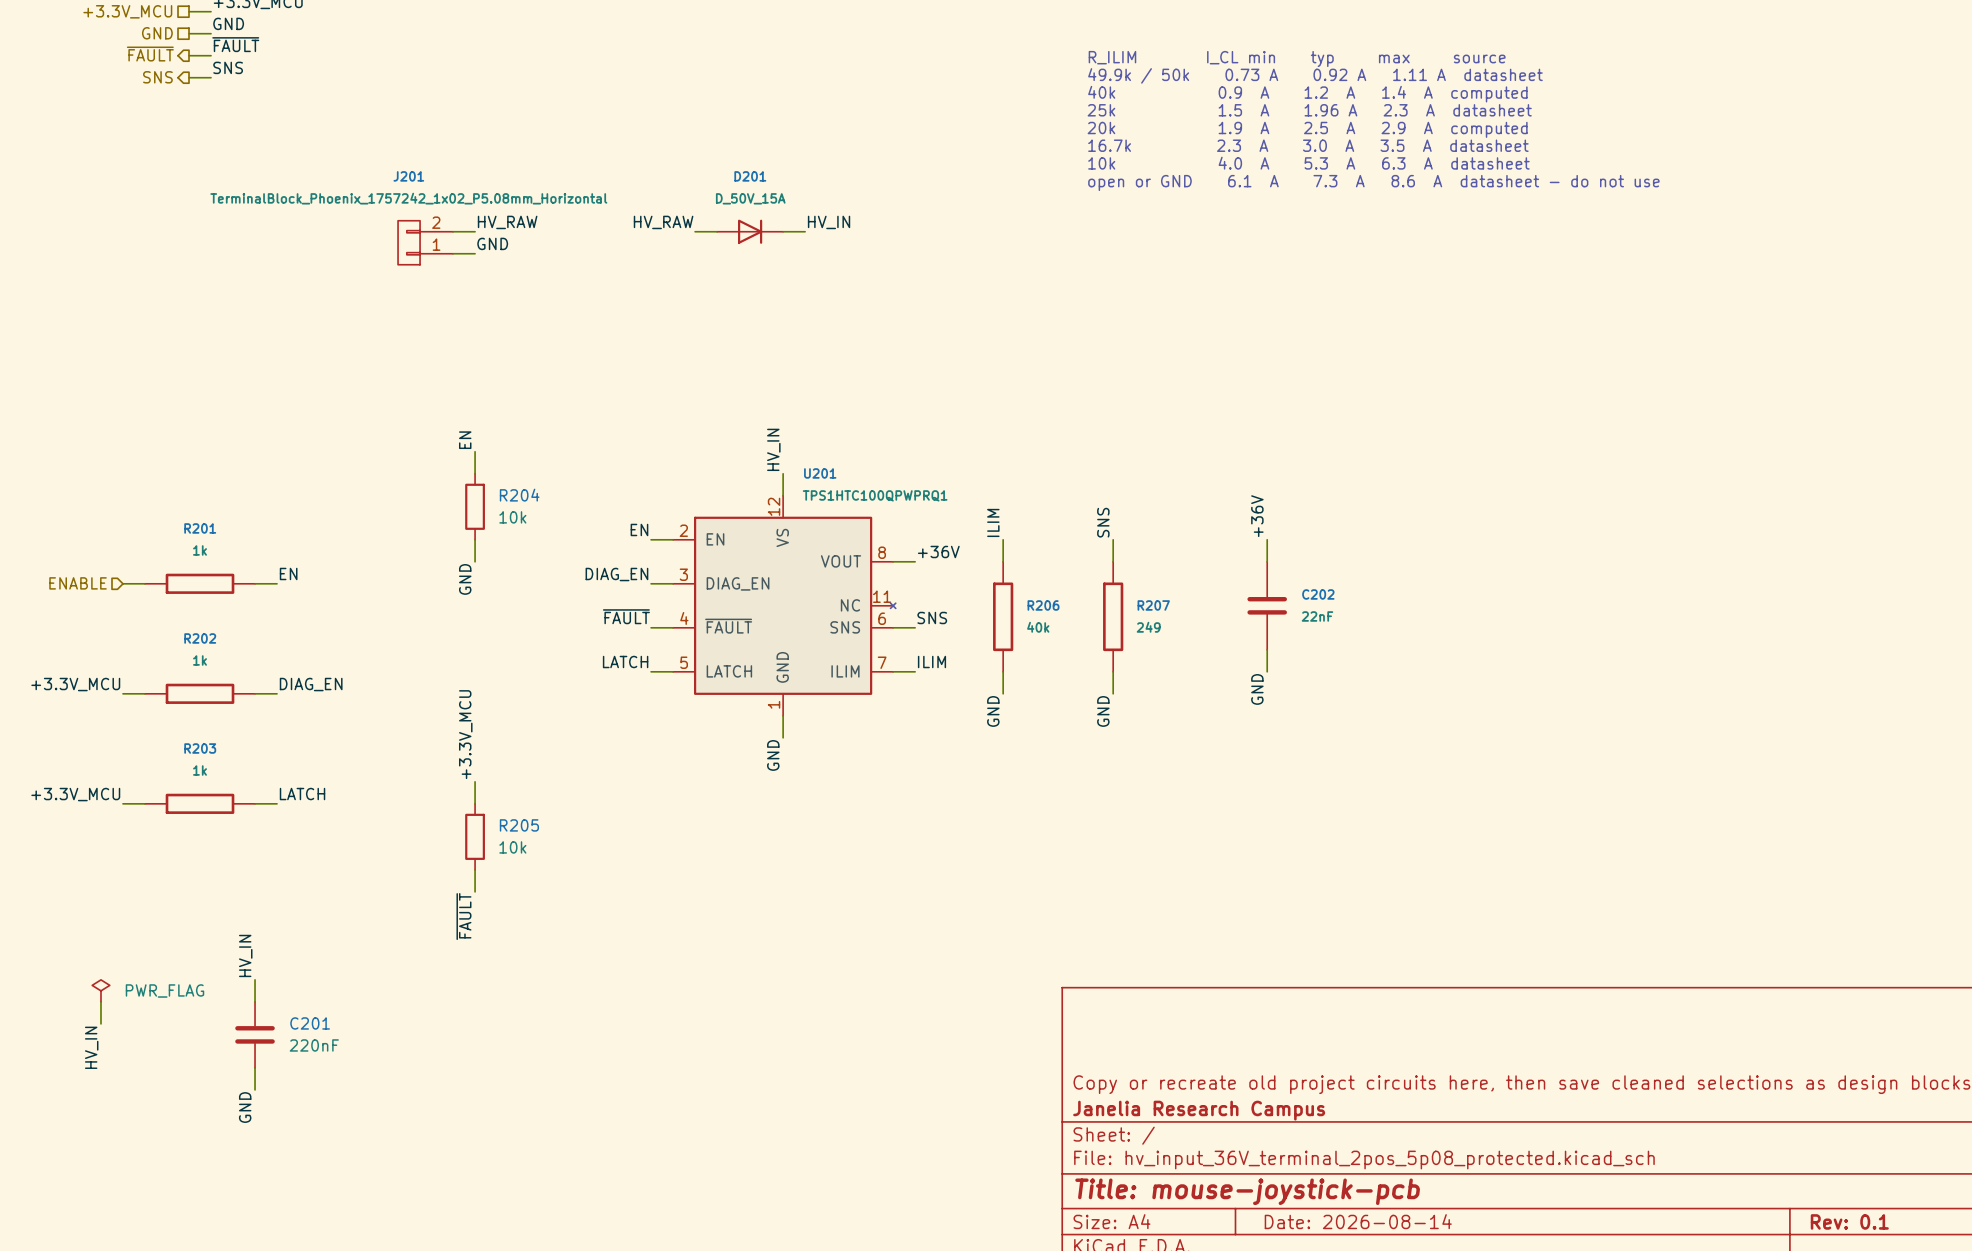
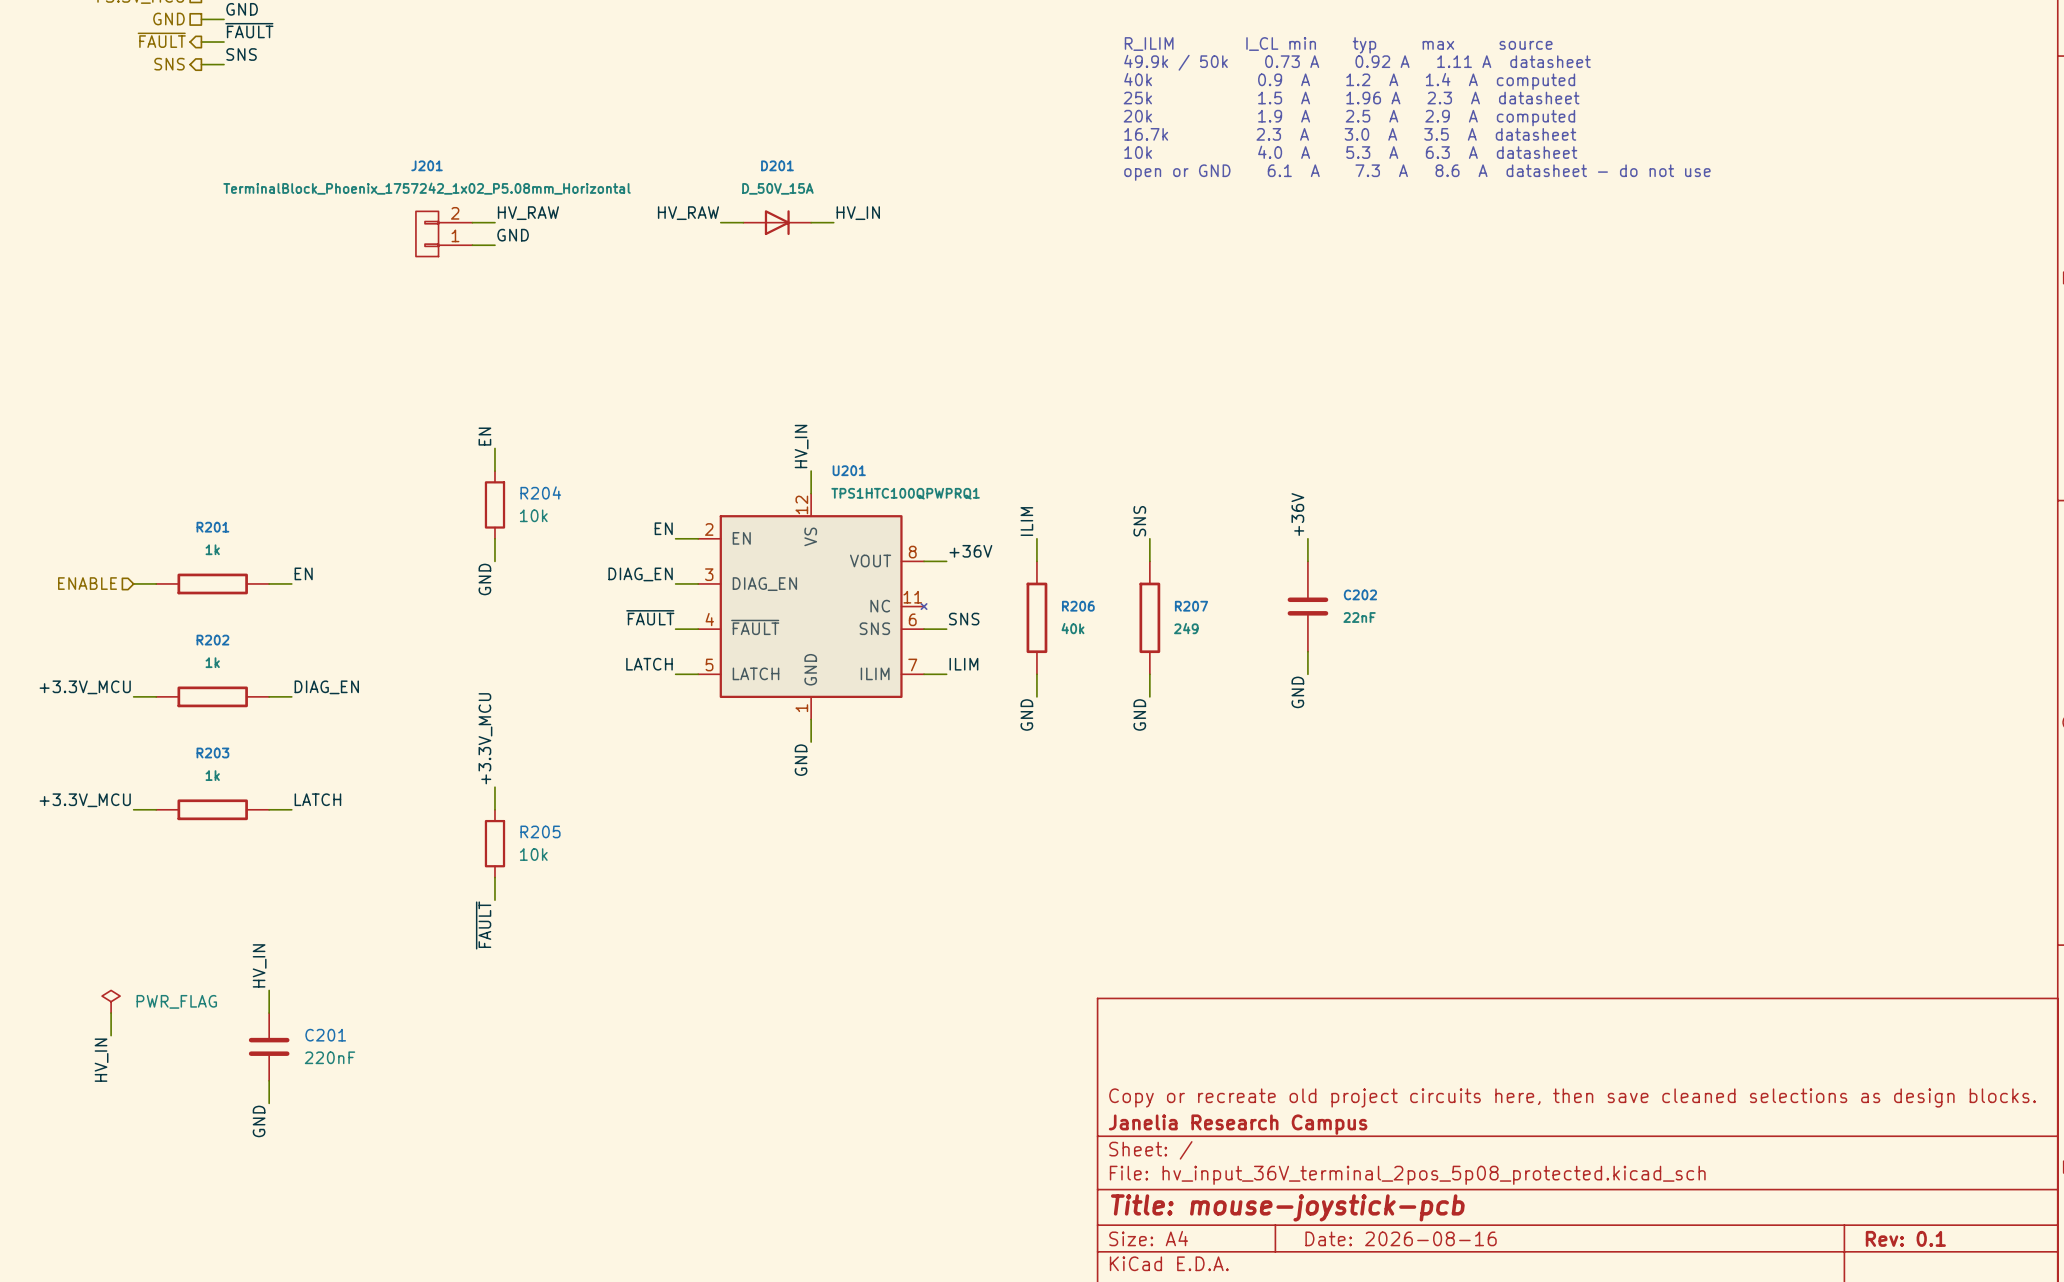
title block: Date: 2026-08-14 (1358, 1221) -> Date: 2026-08-16 (1401, 1238)

